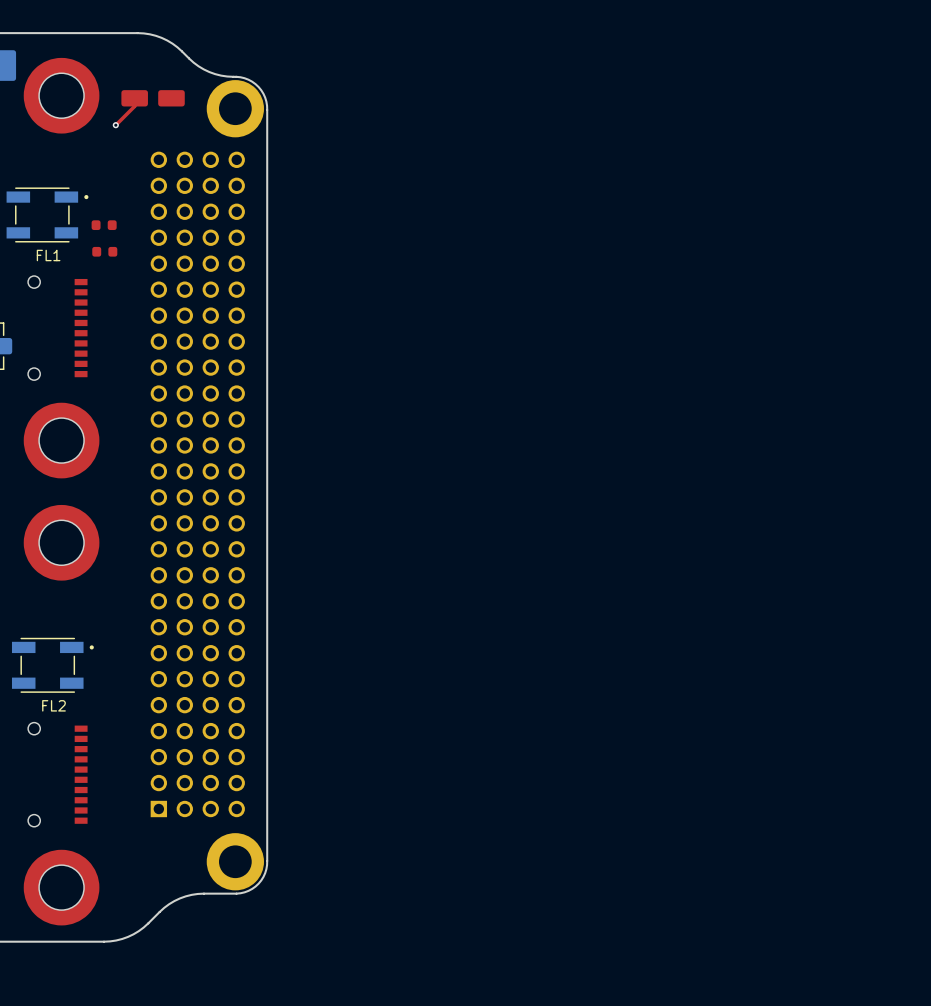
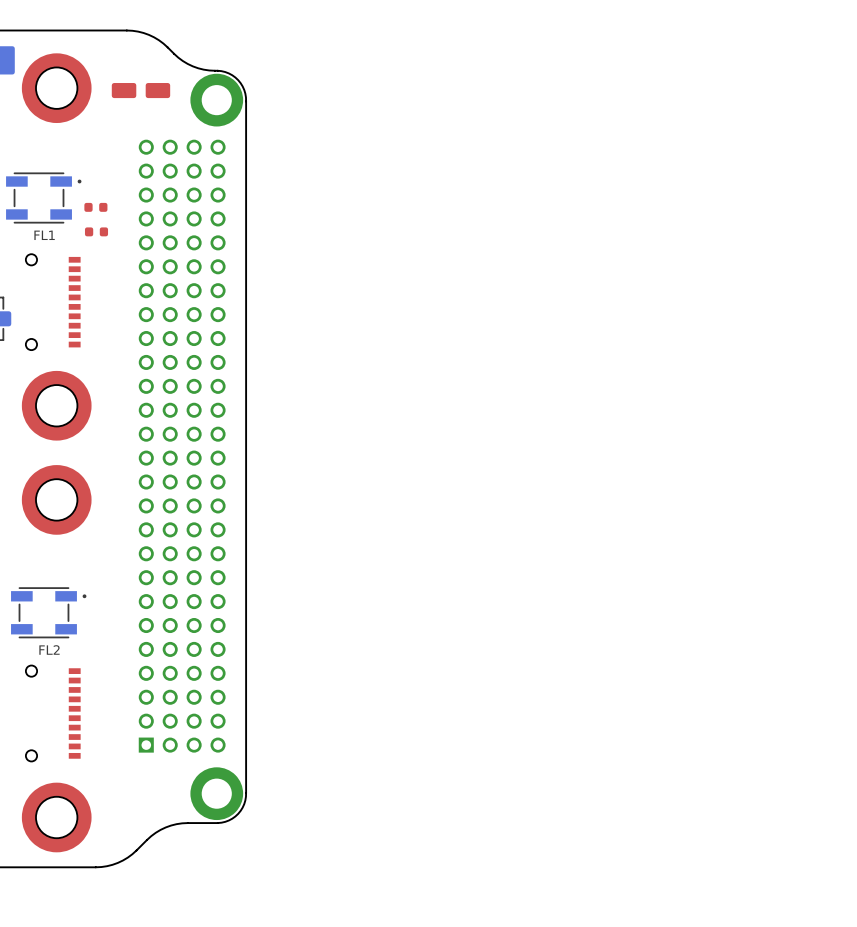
top track: (134, 98) (134, 106) (115, 125) -> none
via: (115, 125) -> none

